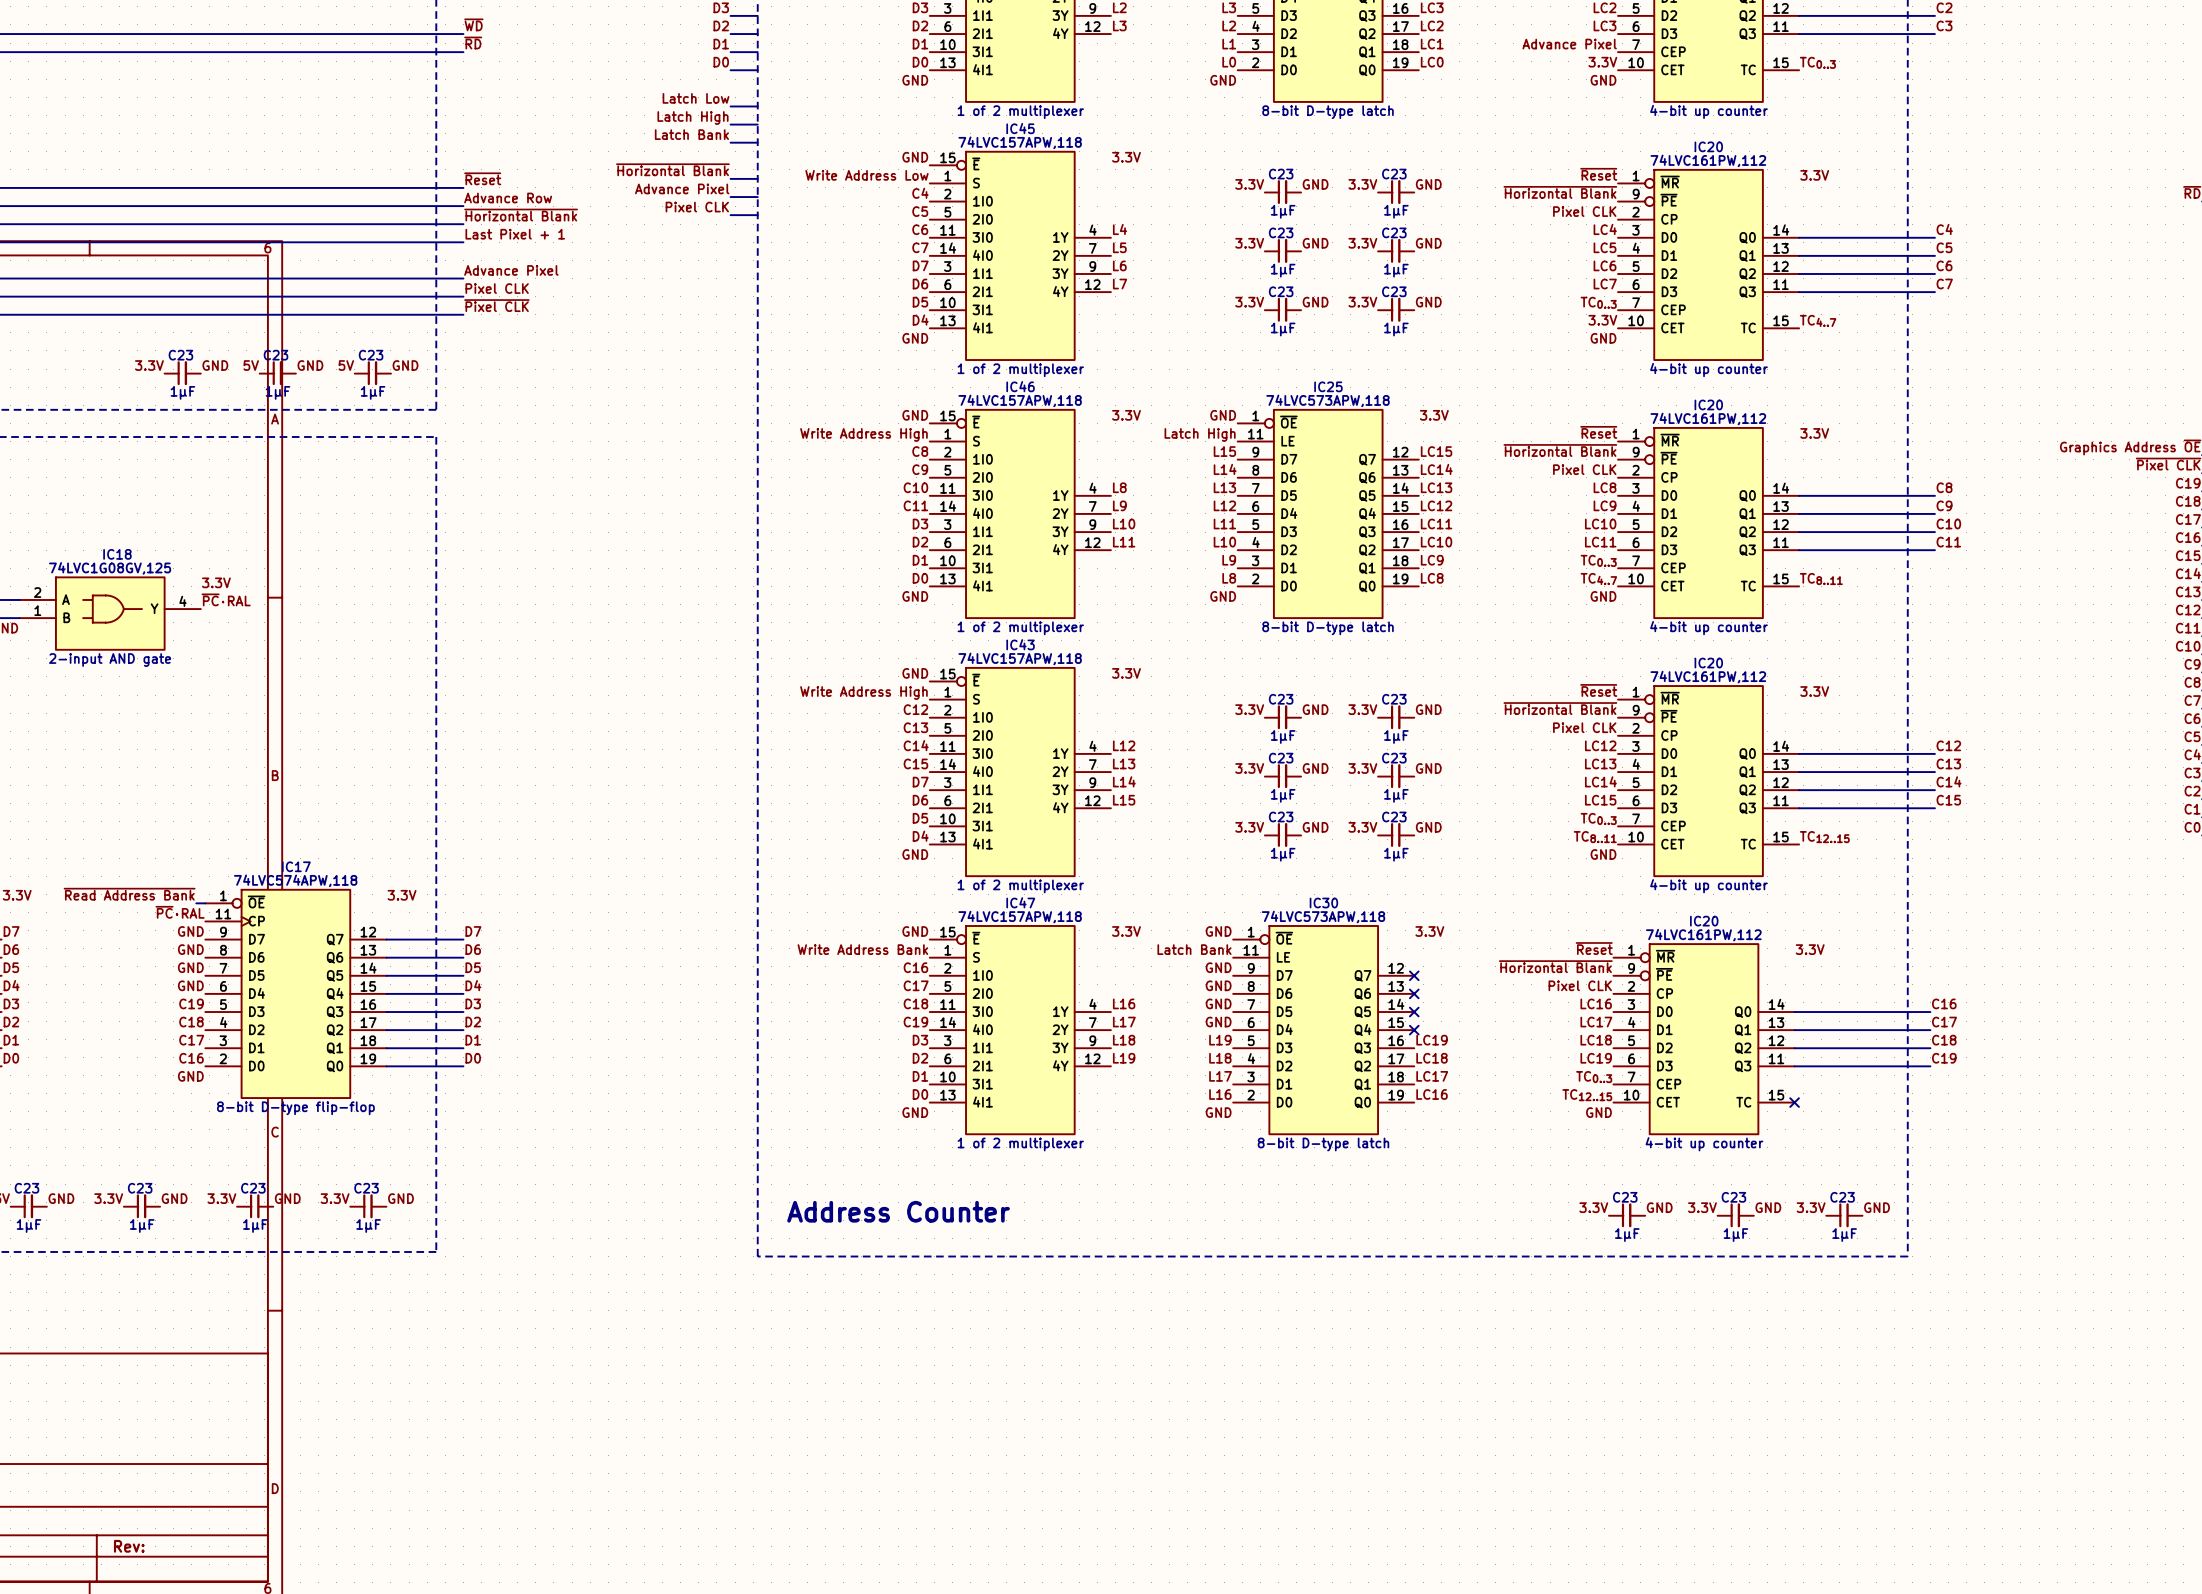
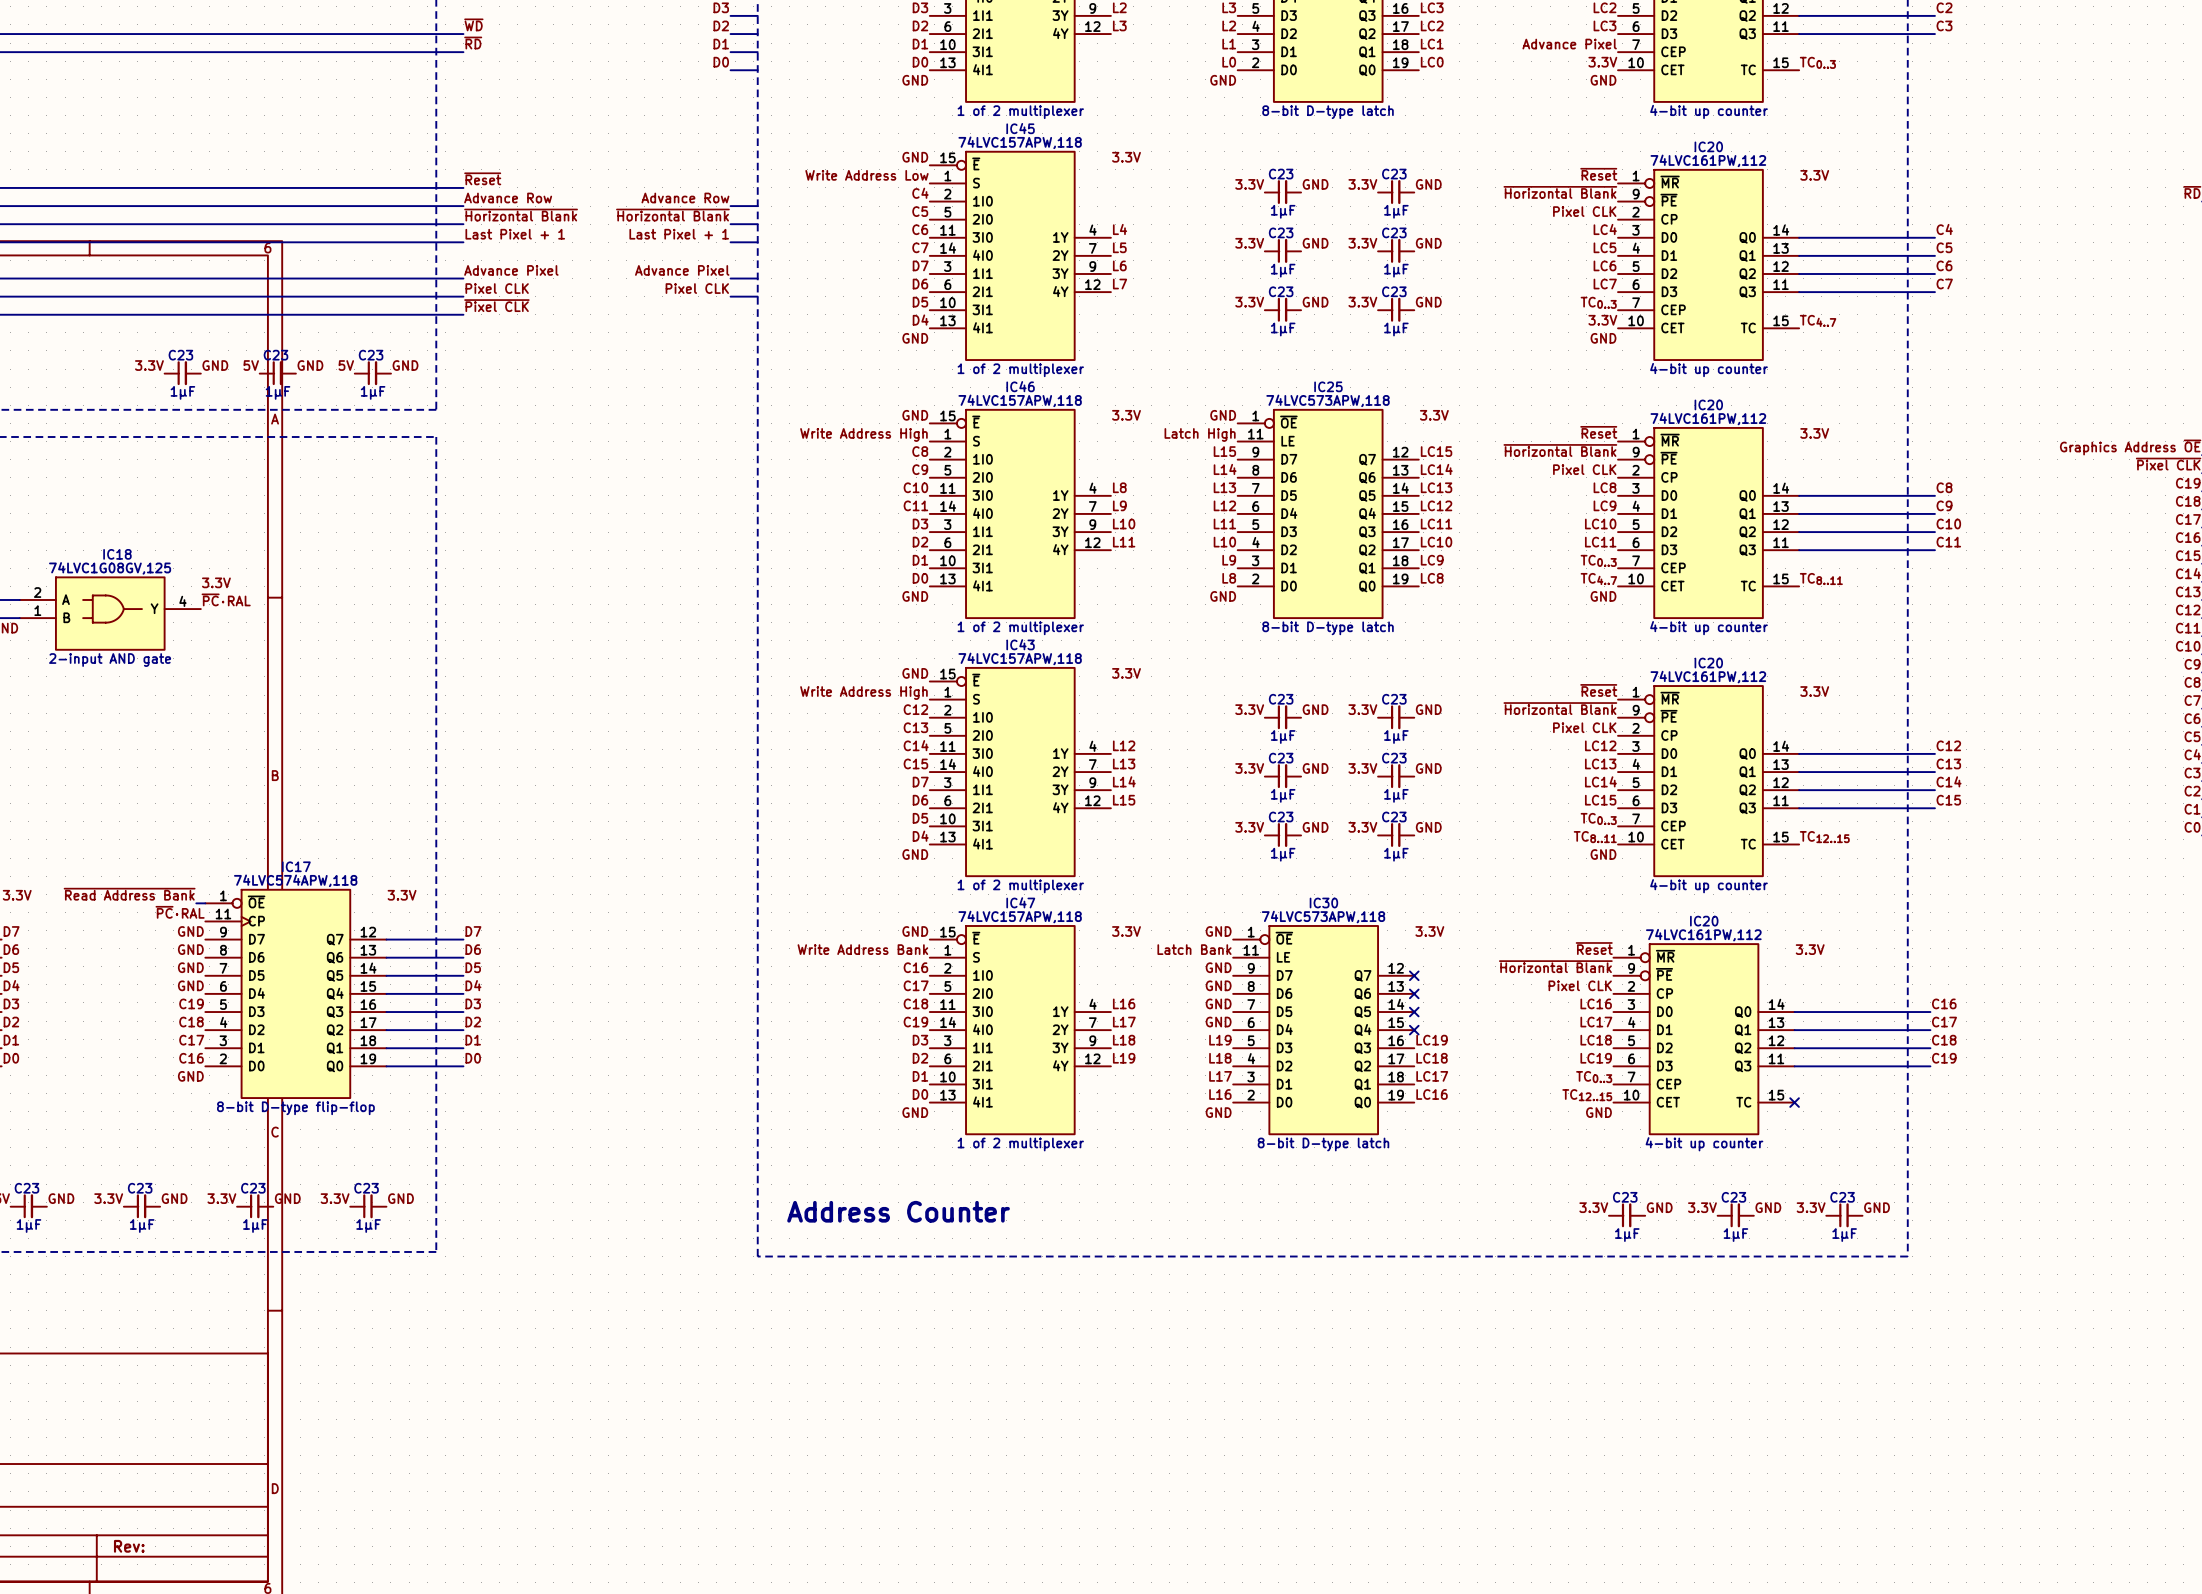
label: Latch Low (696, 98) -> none
wire: (730, 106) (757, 106) -> (730, 206) (757, 206)
label: Latch High (692, 118) -> none
wire: (730, 124) (757, 124) -> (730, 224) (757, 224)
label: Latch Bank (691, 134) -> none
wire: (730, 142) (757, 142) -> (730, 242) (757, 242)
label position: ~{Horizontal Blank} (672, 169) -> ~{Horizontal Blank} (672, 215)
wire: (730, 178) (757, 178) -> (730, 278) (757, 278)
label position: Advance Pixel (682, 188) -> Advance Pixel (682, 270)
wire: (730, 197) (757, 197) -> (730, 296) (757, 296)
label: none -> Advance Row (685, 198)
label position: Pixel CLK (697, 207) -> Pixel CLK (697, 288)
wire: (730, 215) (757, 215) -> none
label: none -> Last Pixel + 1 (679, 234)

